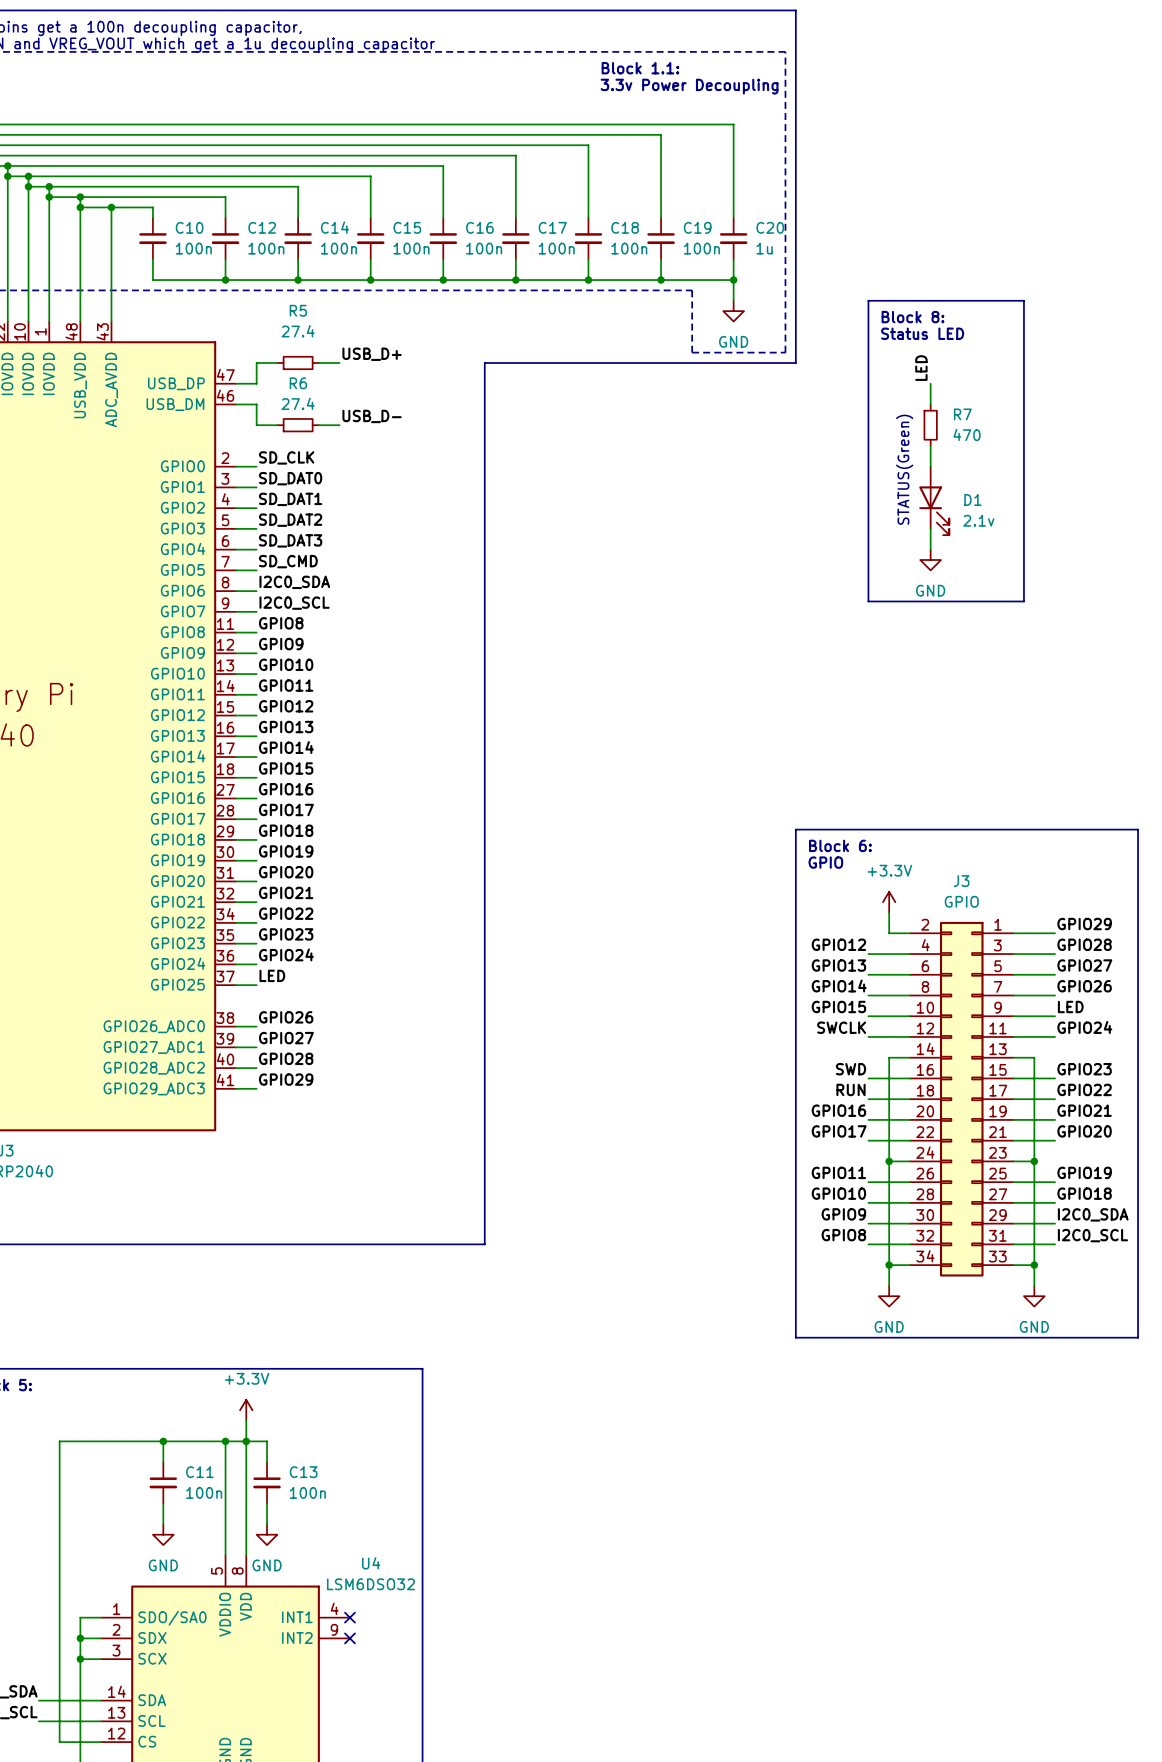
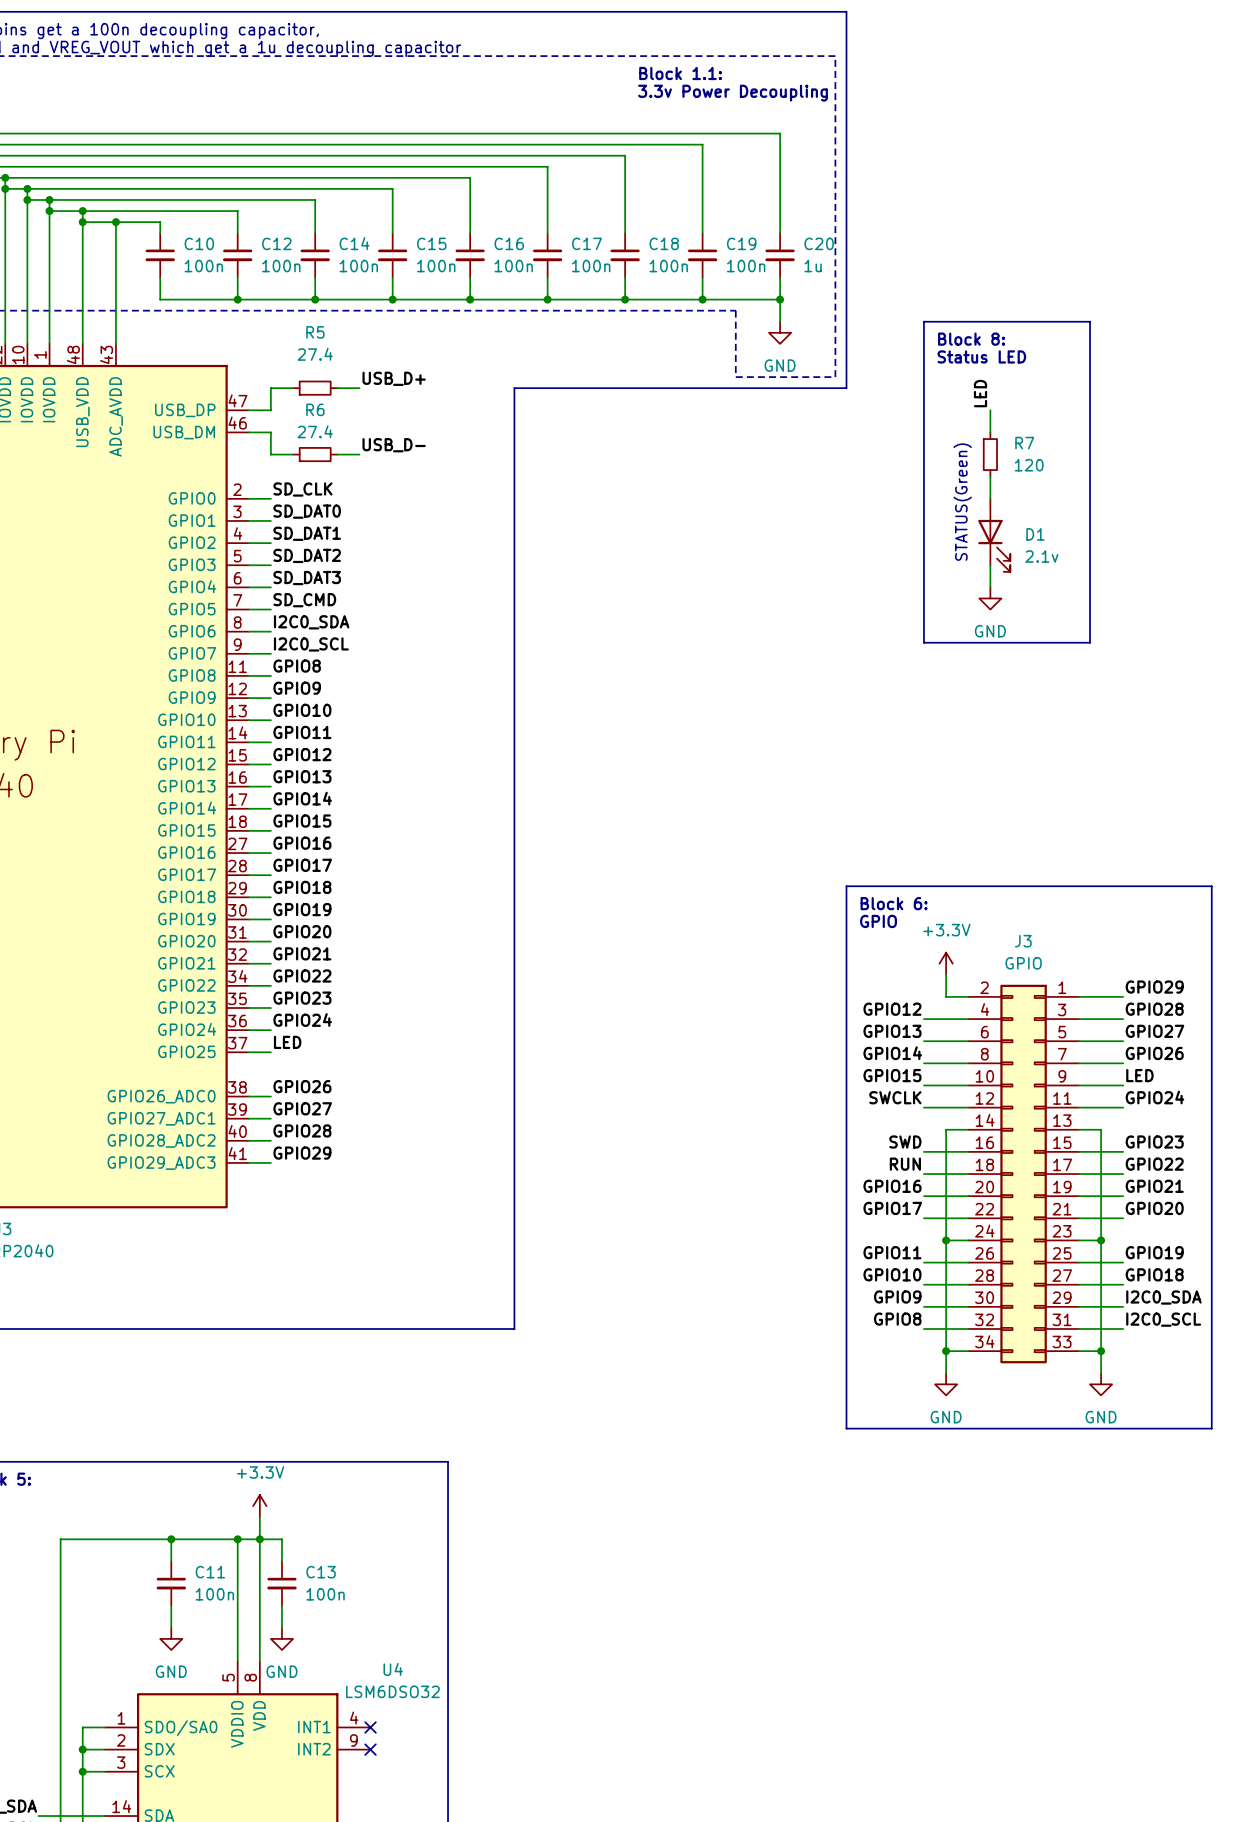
R7 value: 470 (967, 434) -> 120 (1029, 465)

